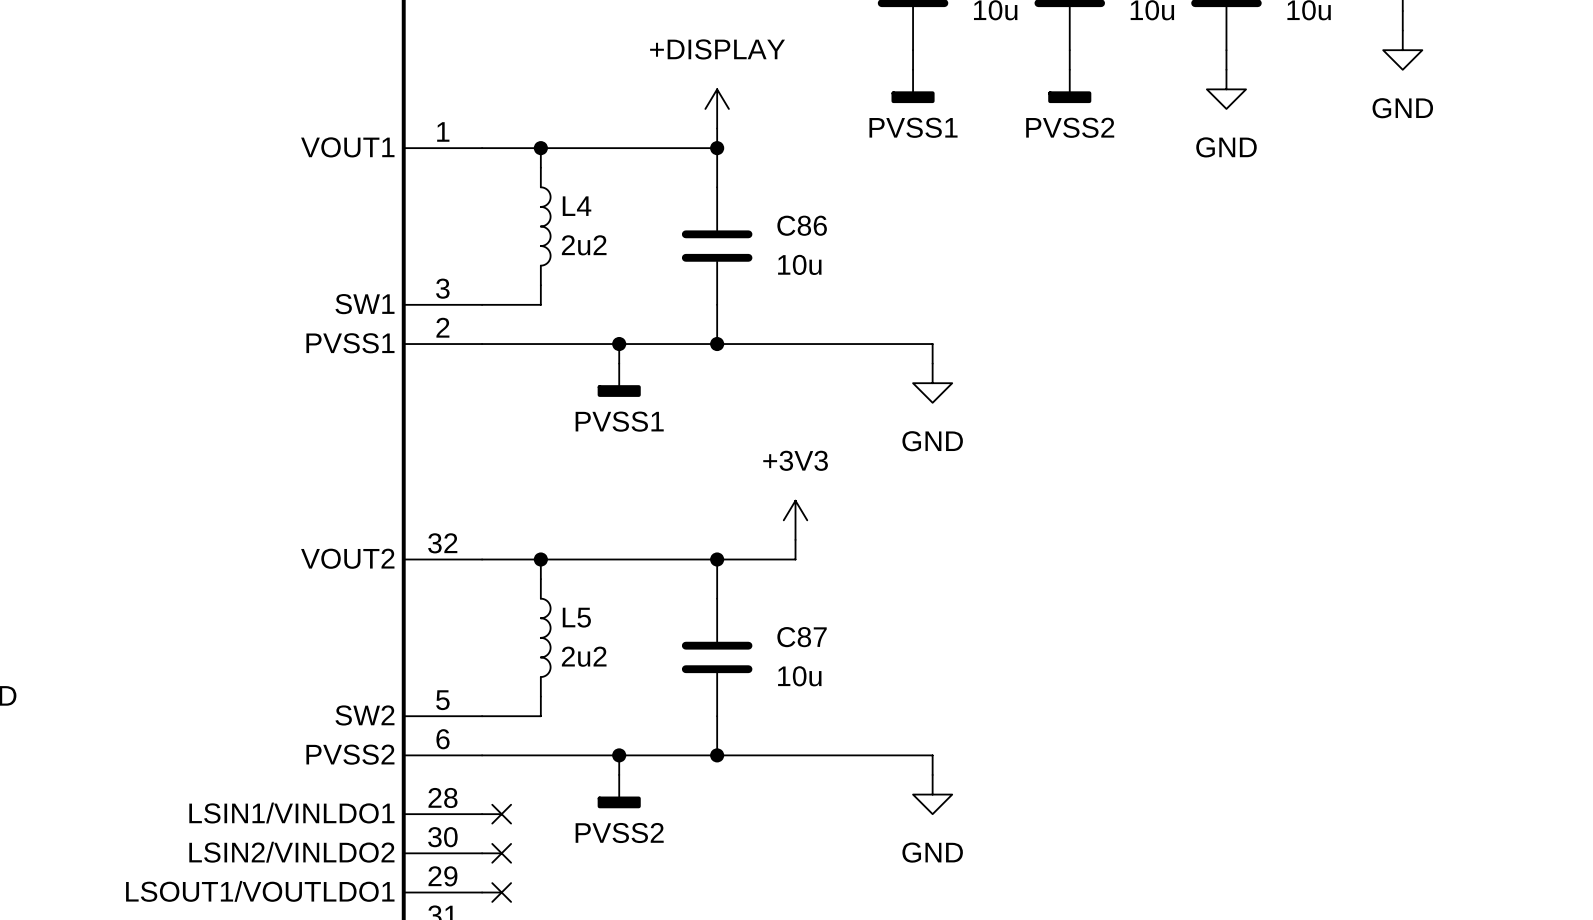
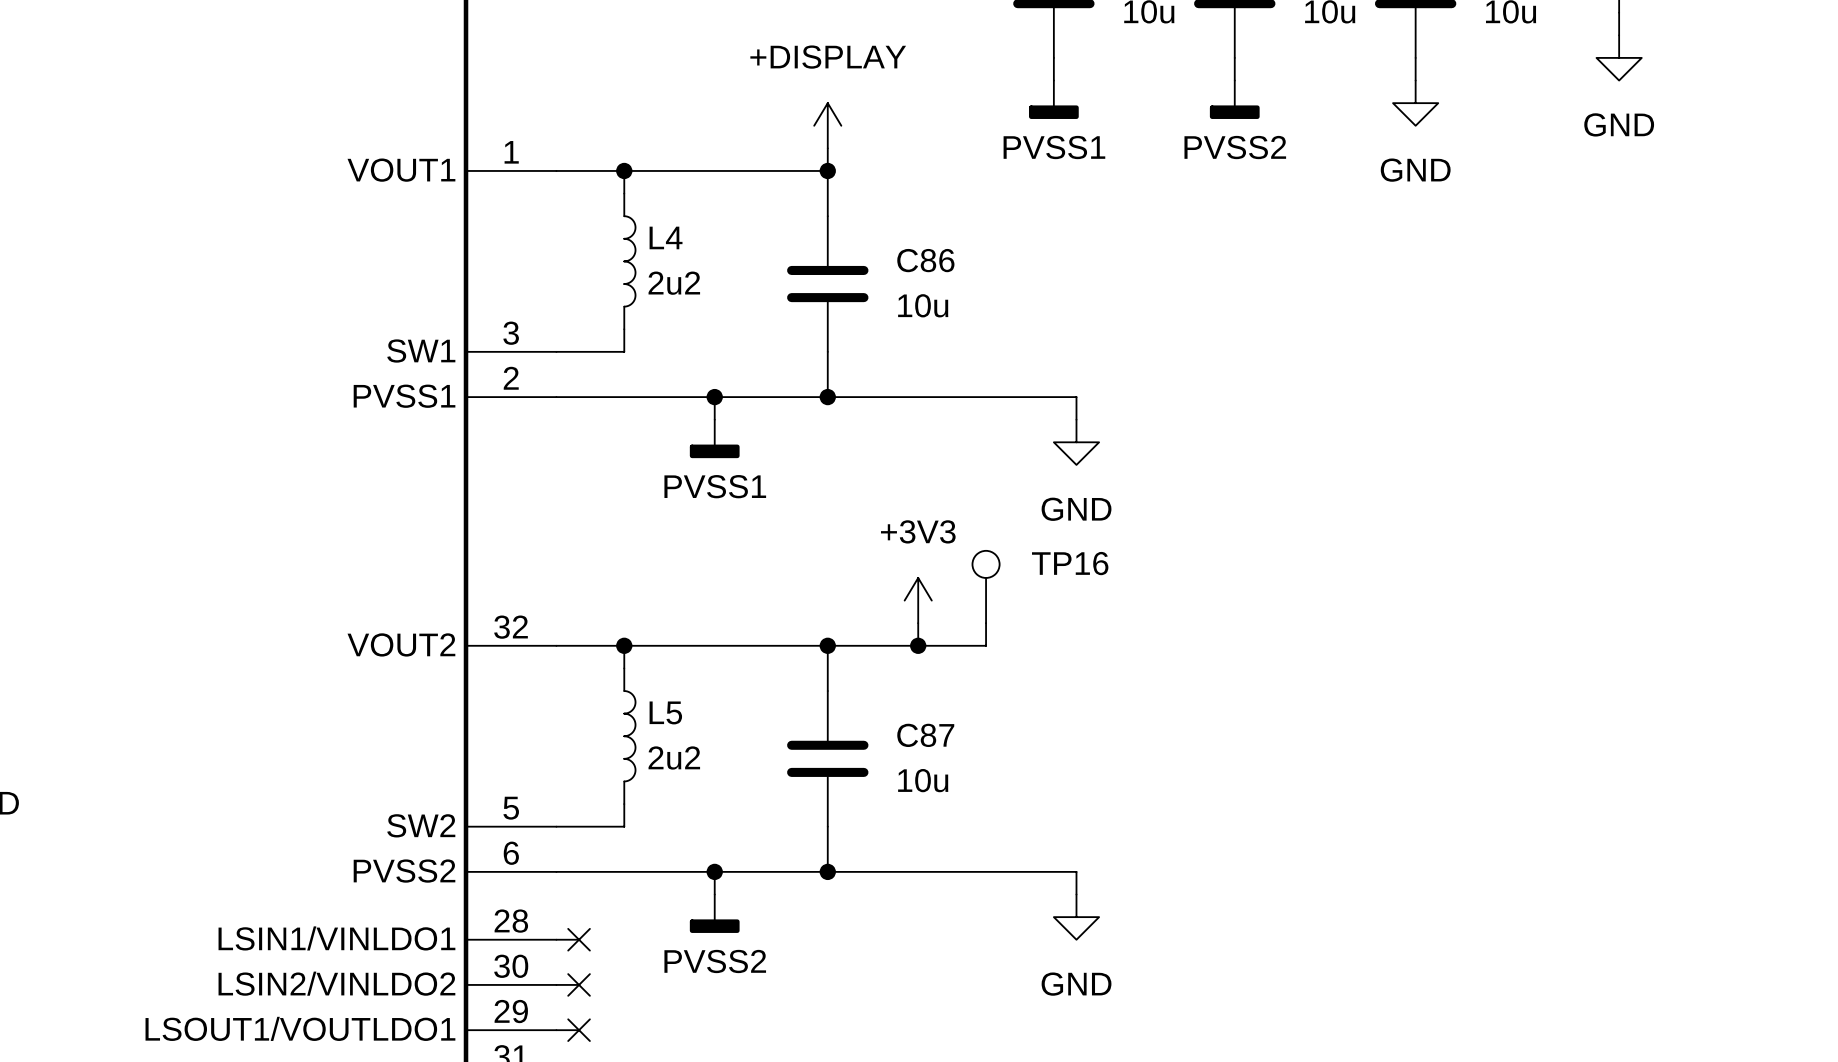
TP16: none -> (986, 587)
wire: none -> (986, 623) (986, 645) (918, 645)
junction: none -> (918, 645)

